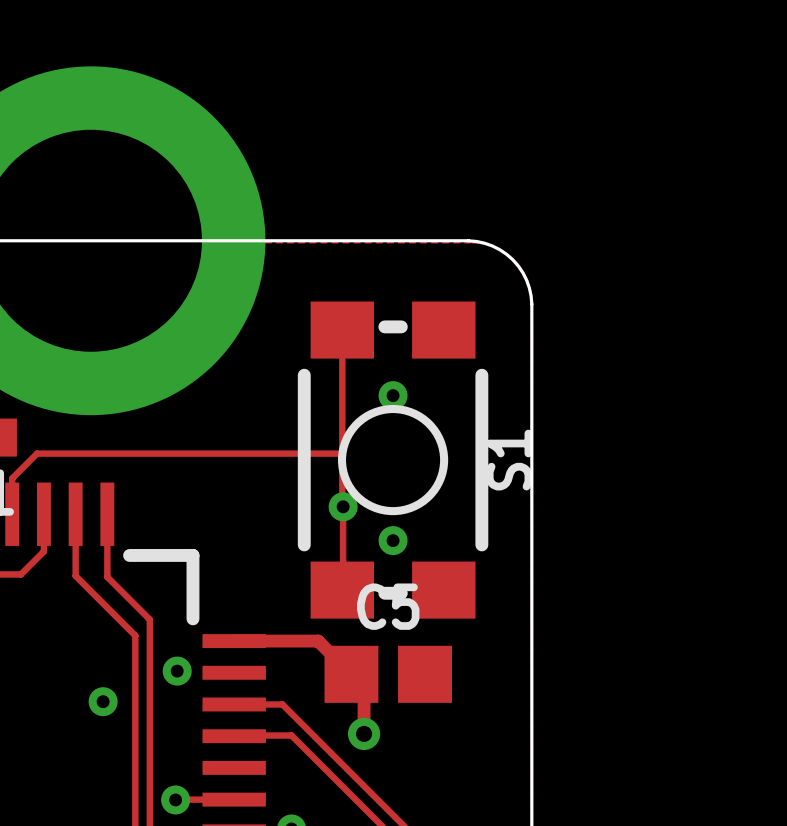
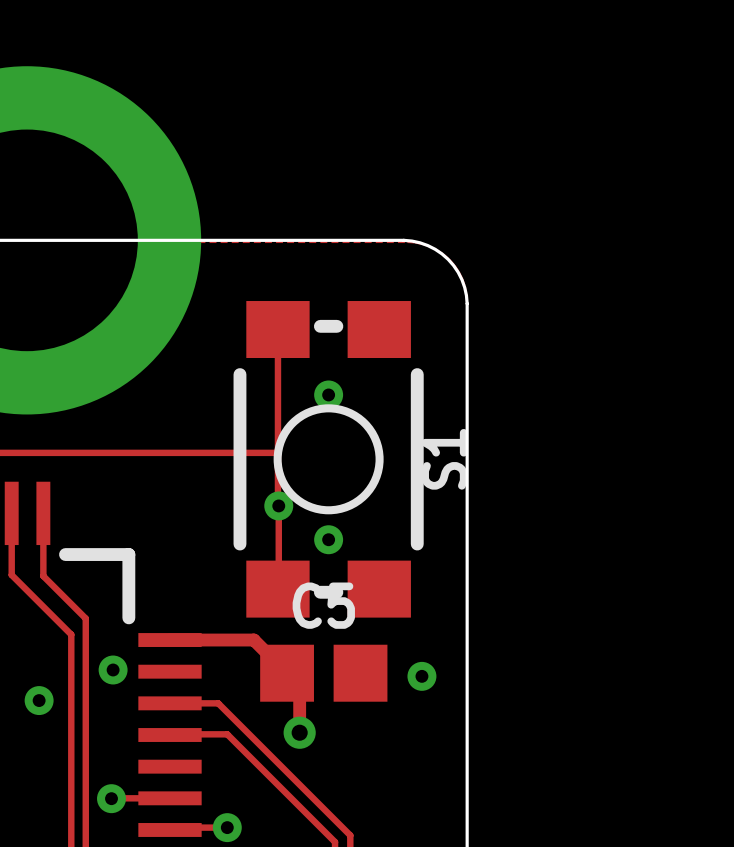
via: none -> (421, 676)

